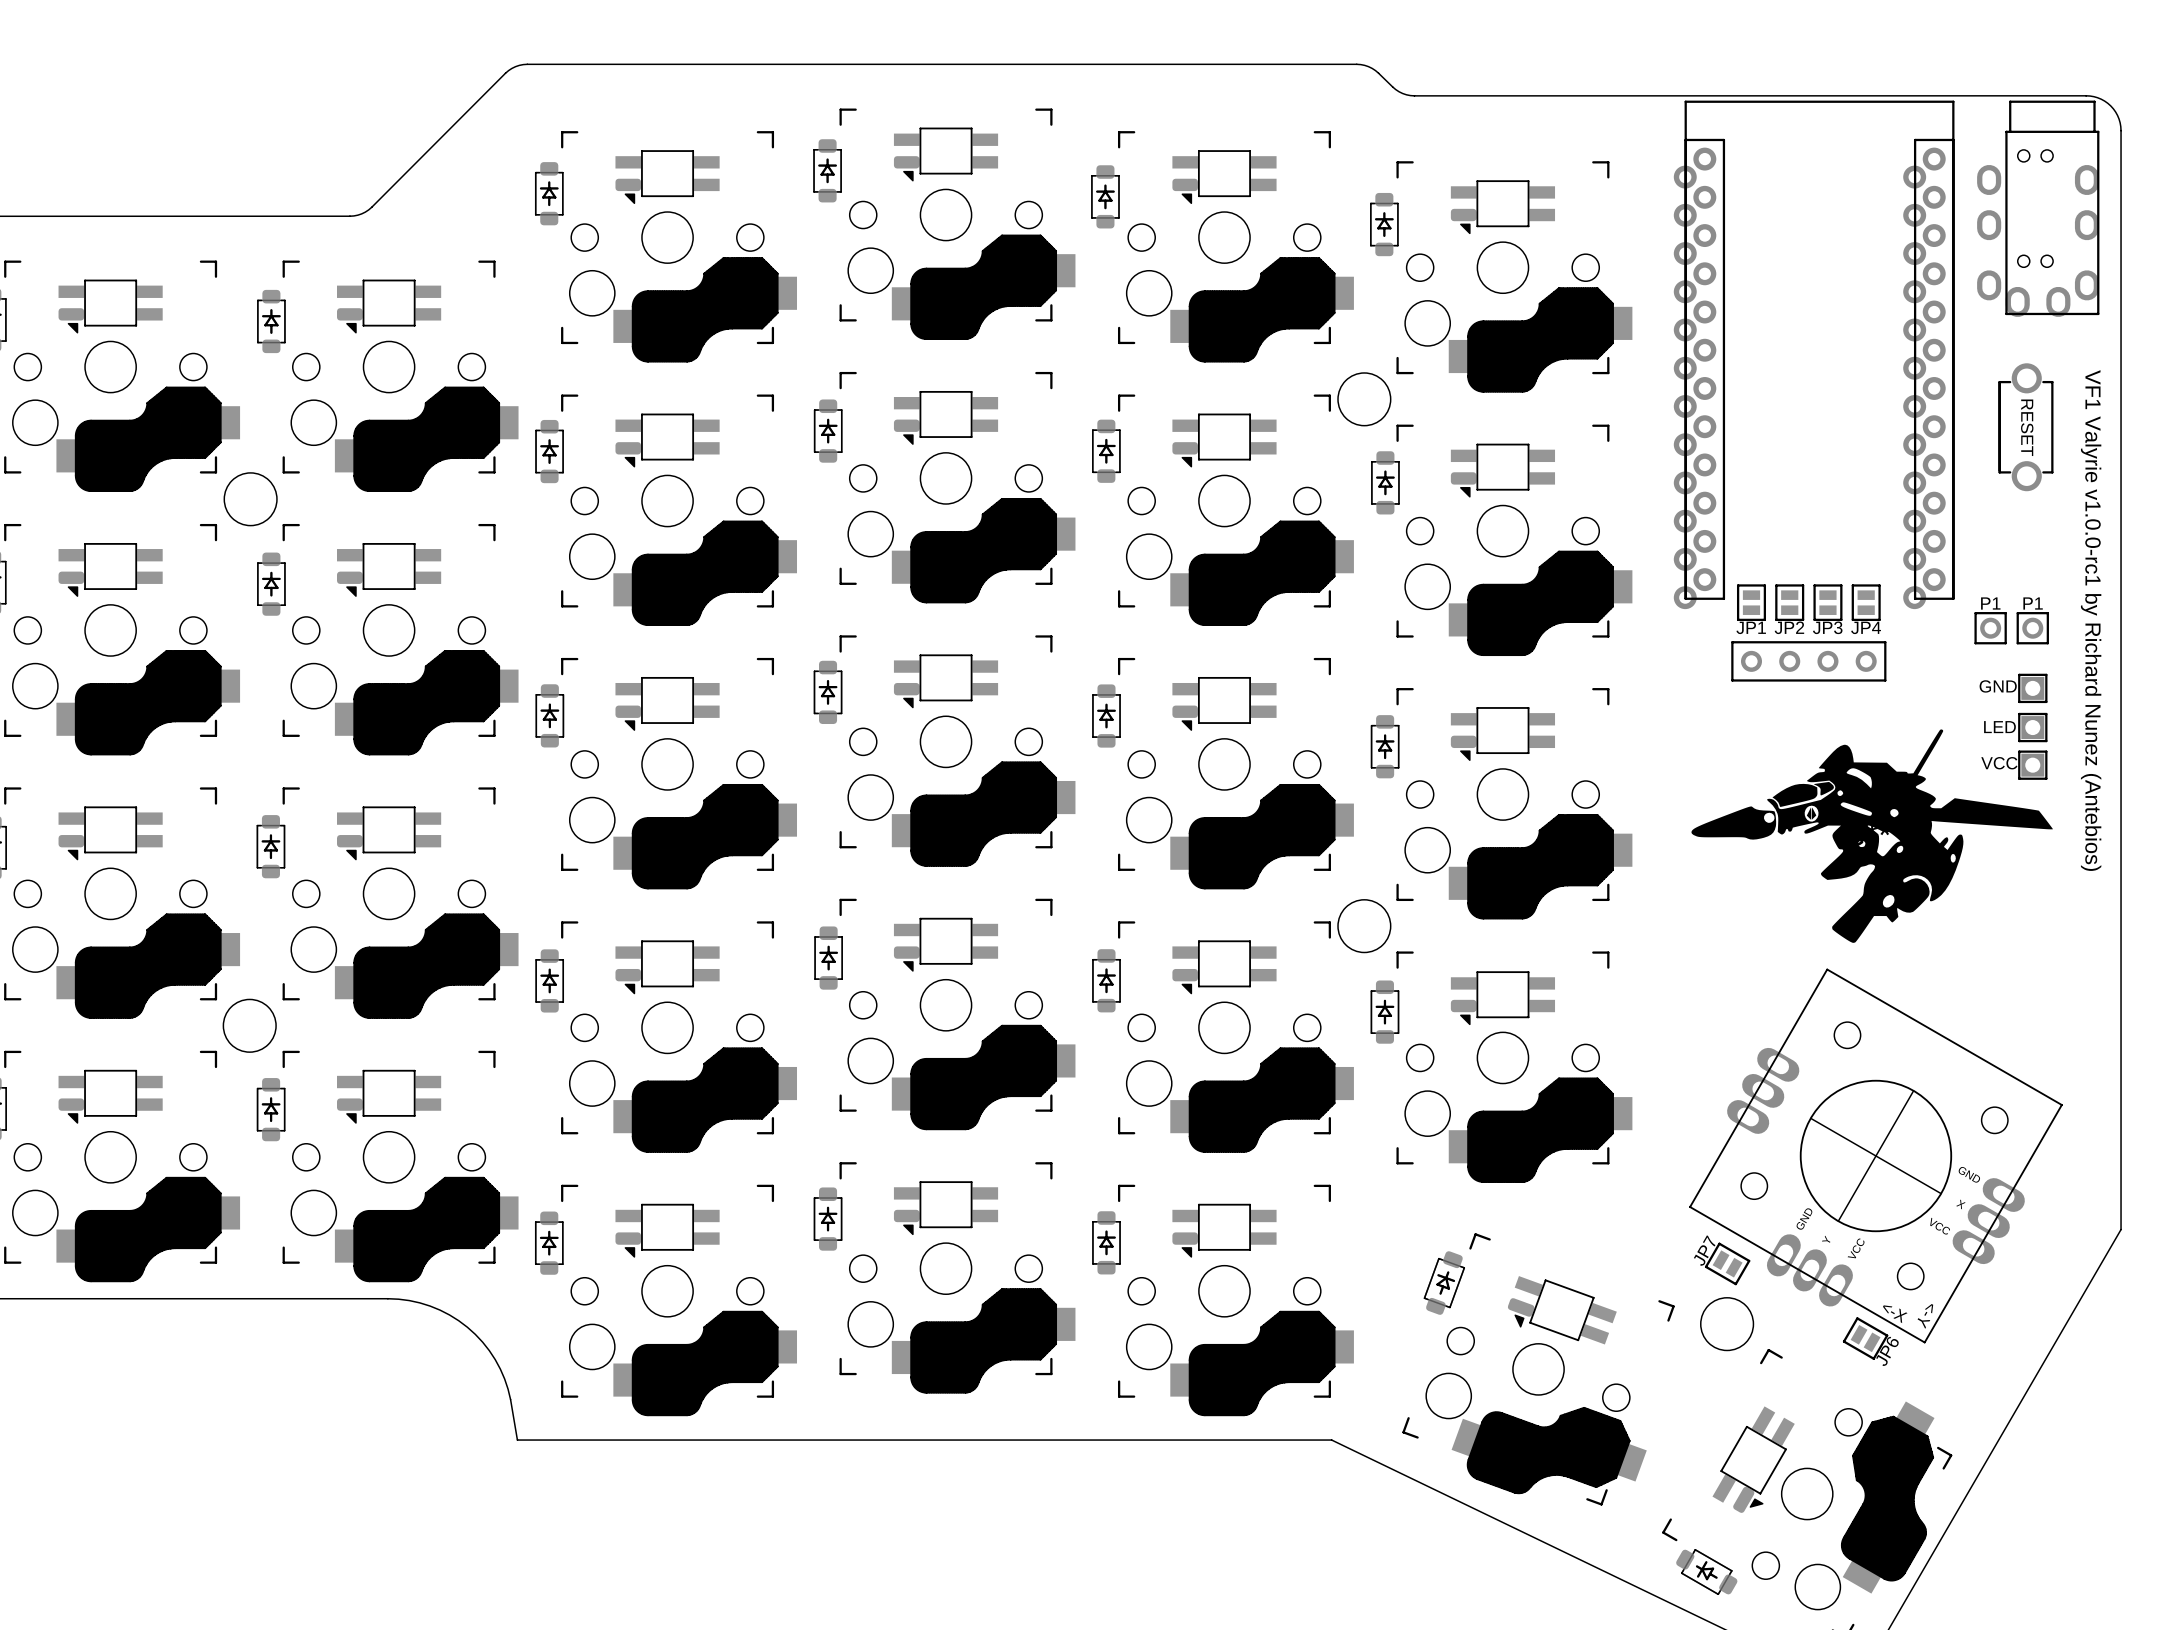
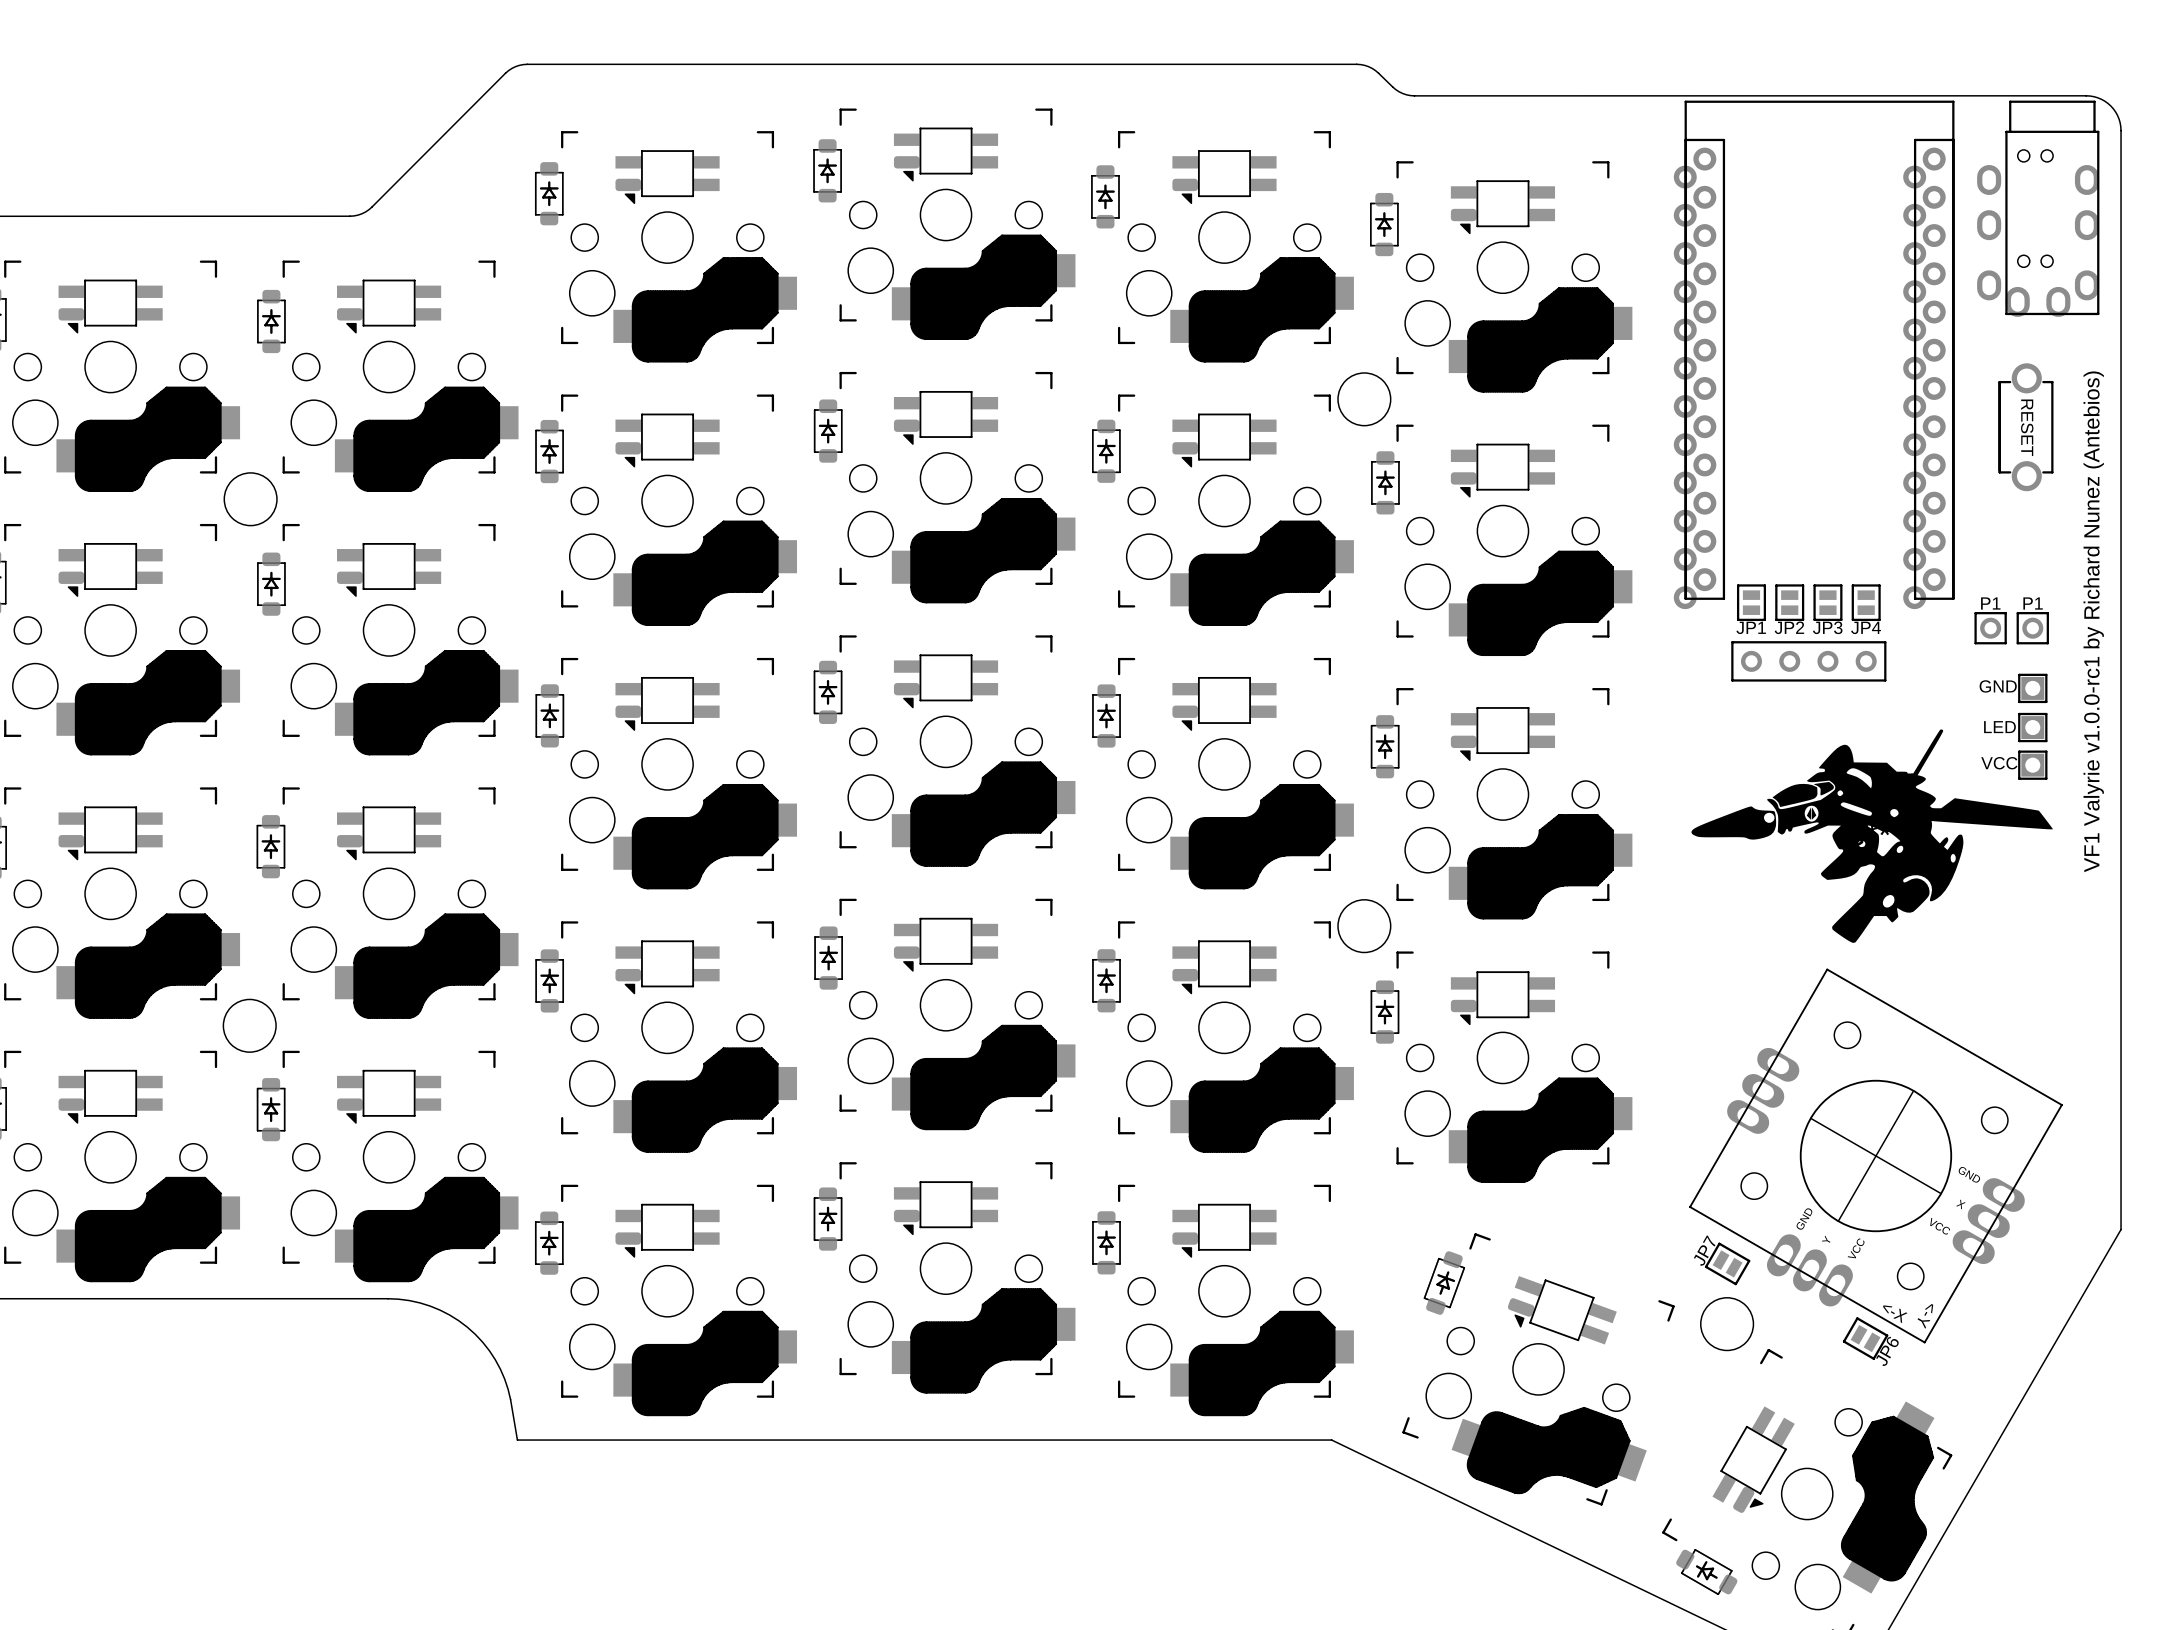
text rotation: 0° (2091, 620) -> 180° (2093, 621)

